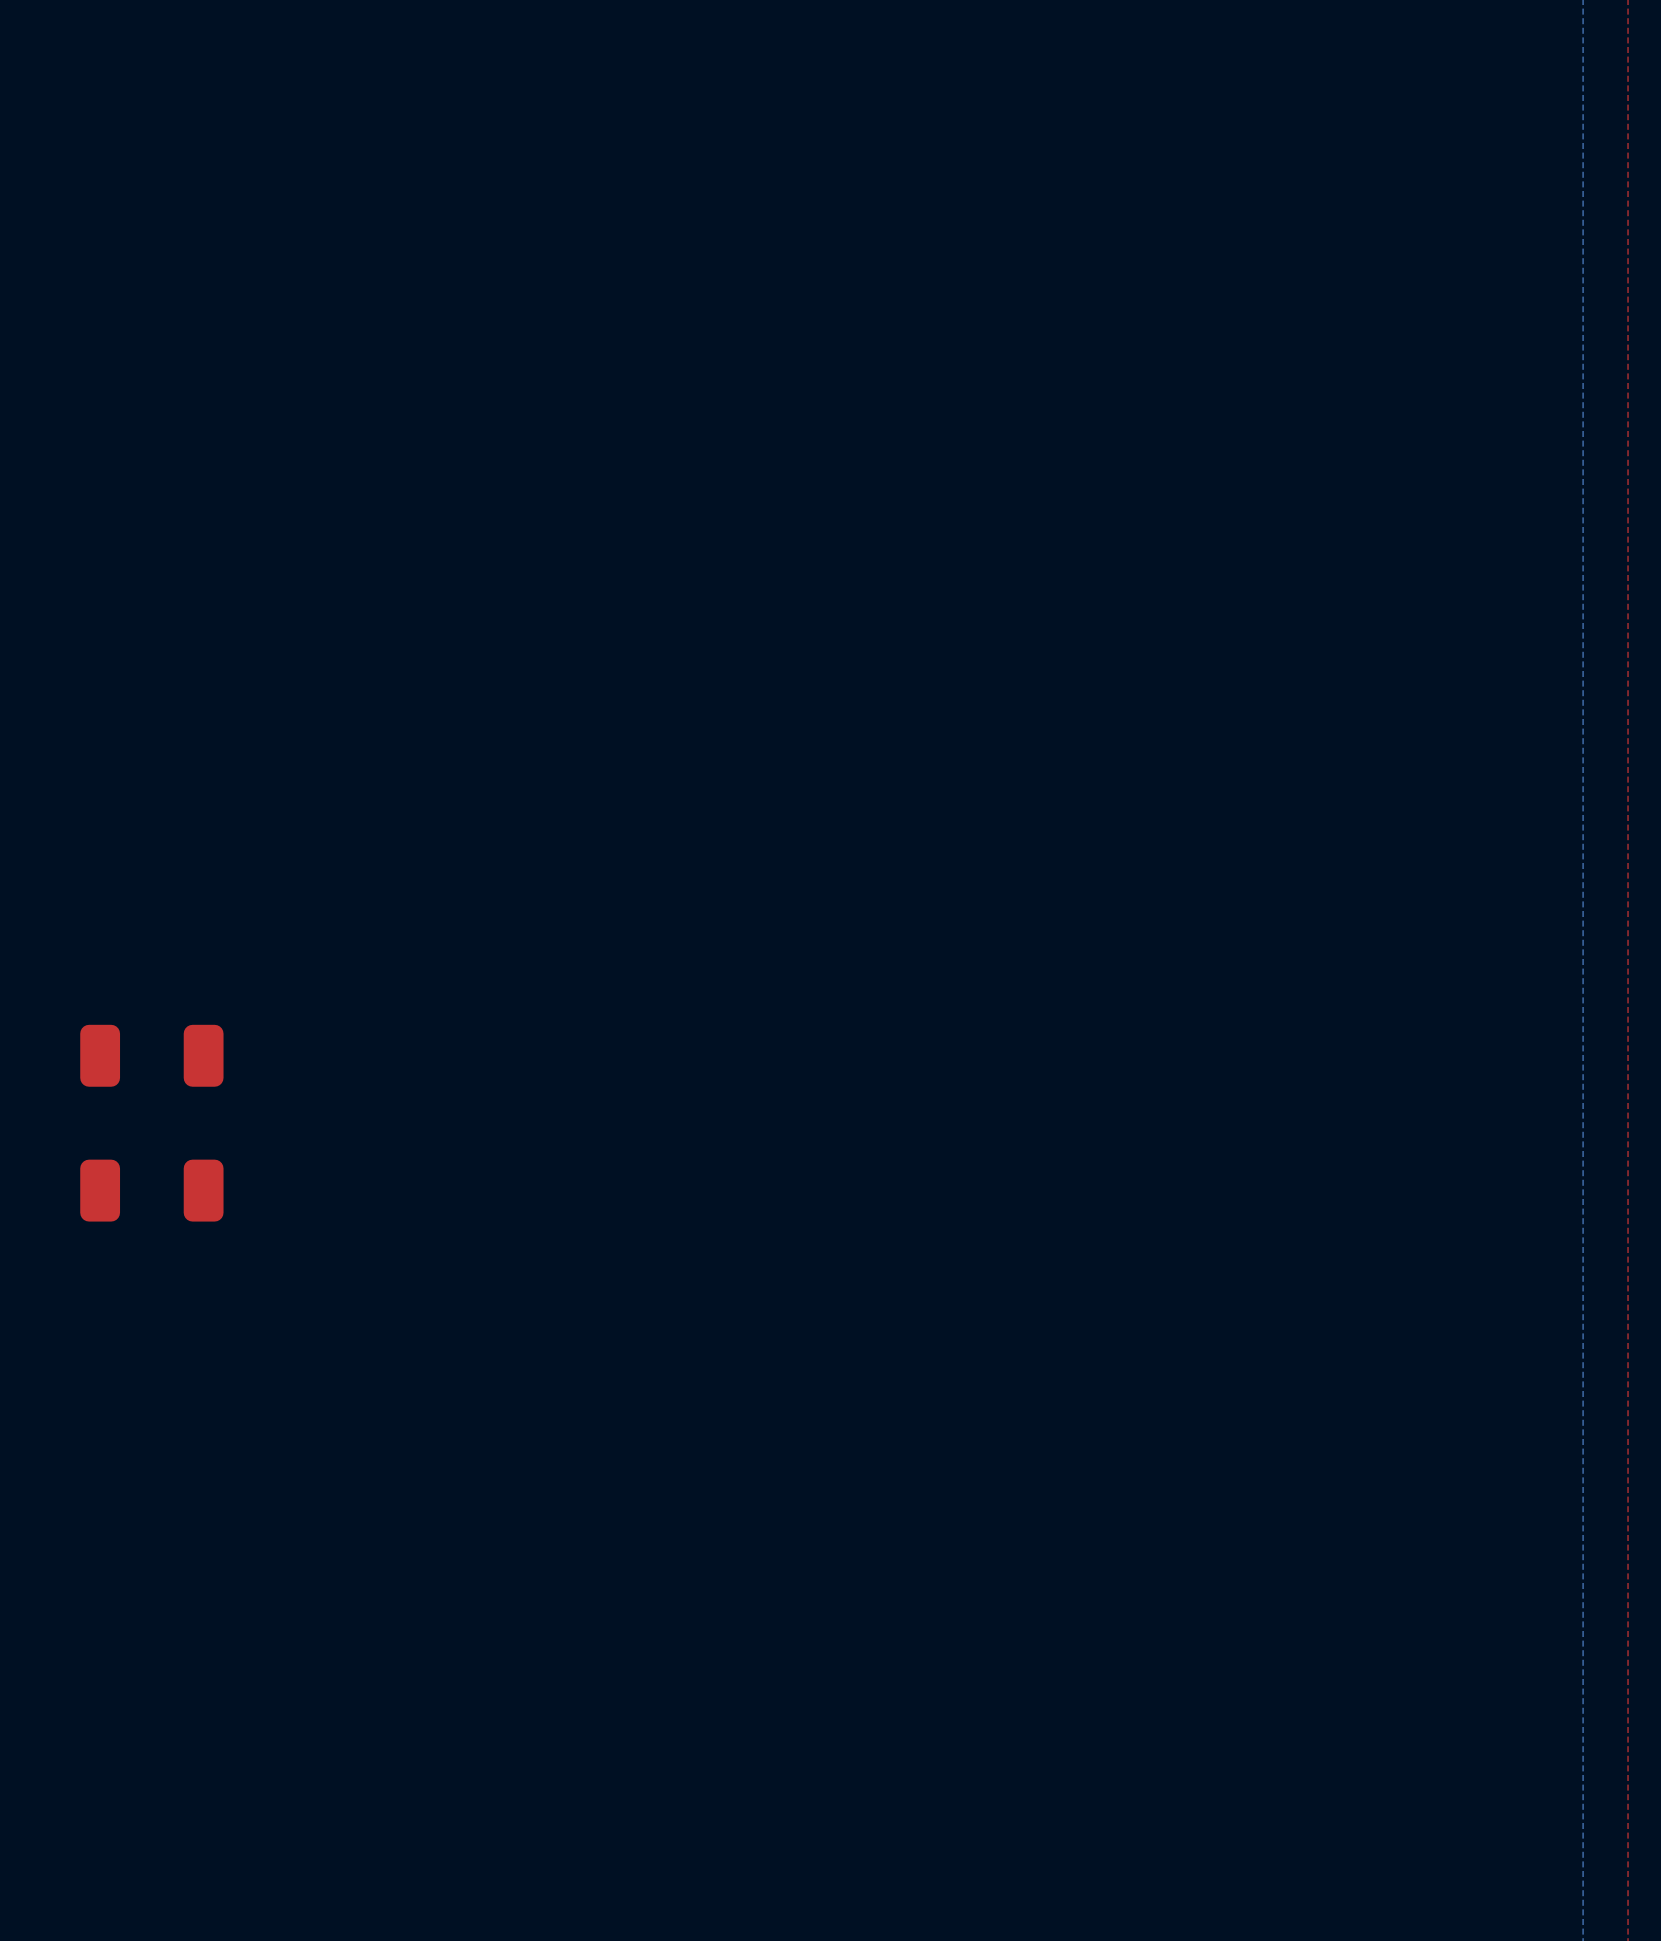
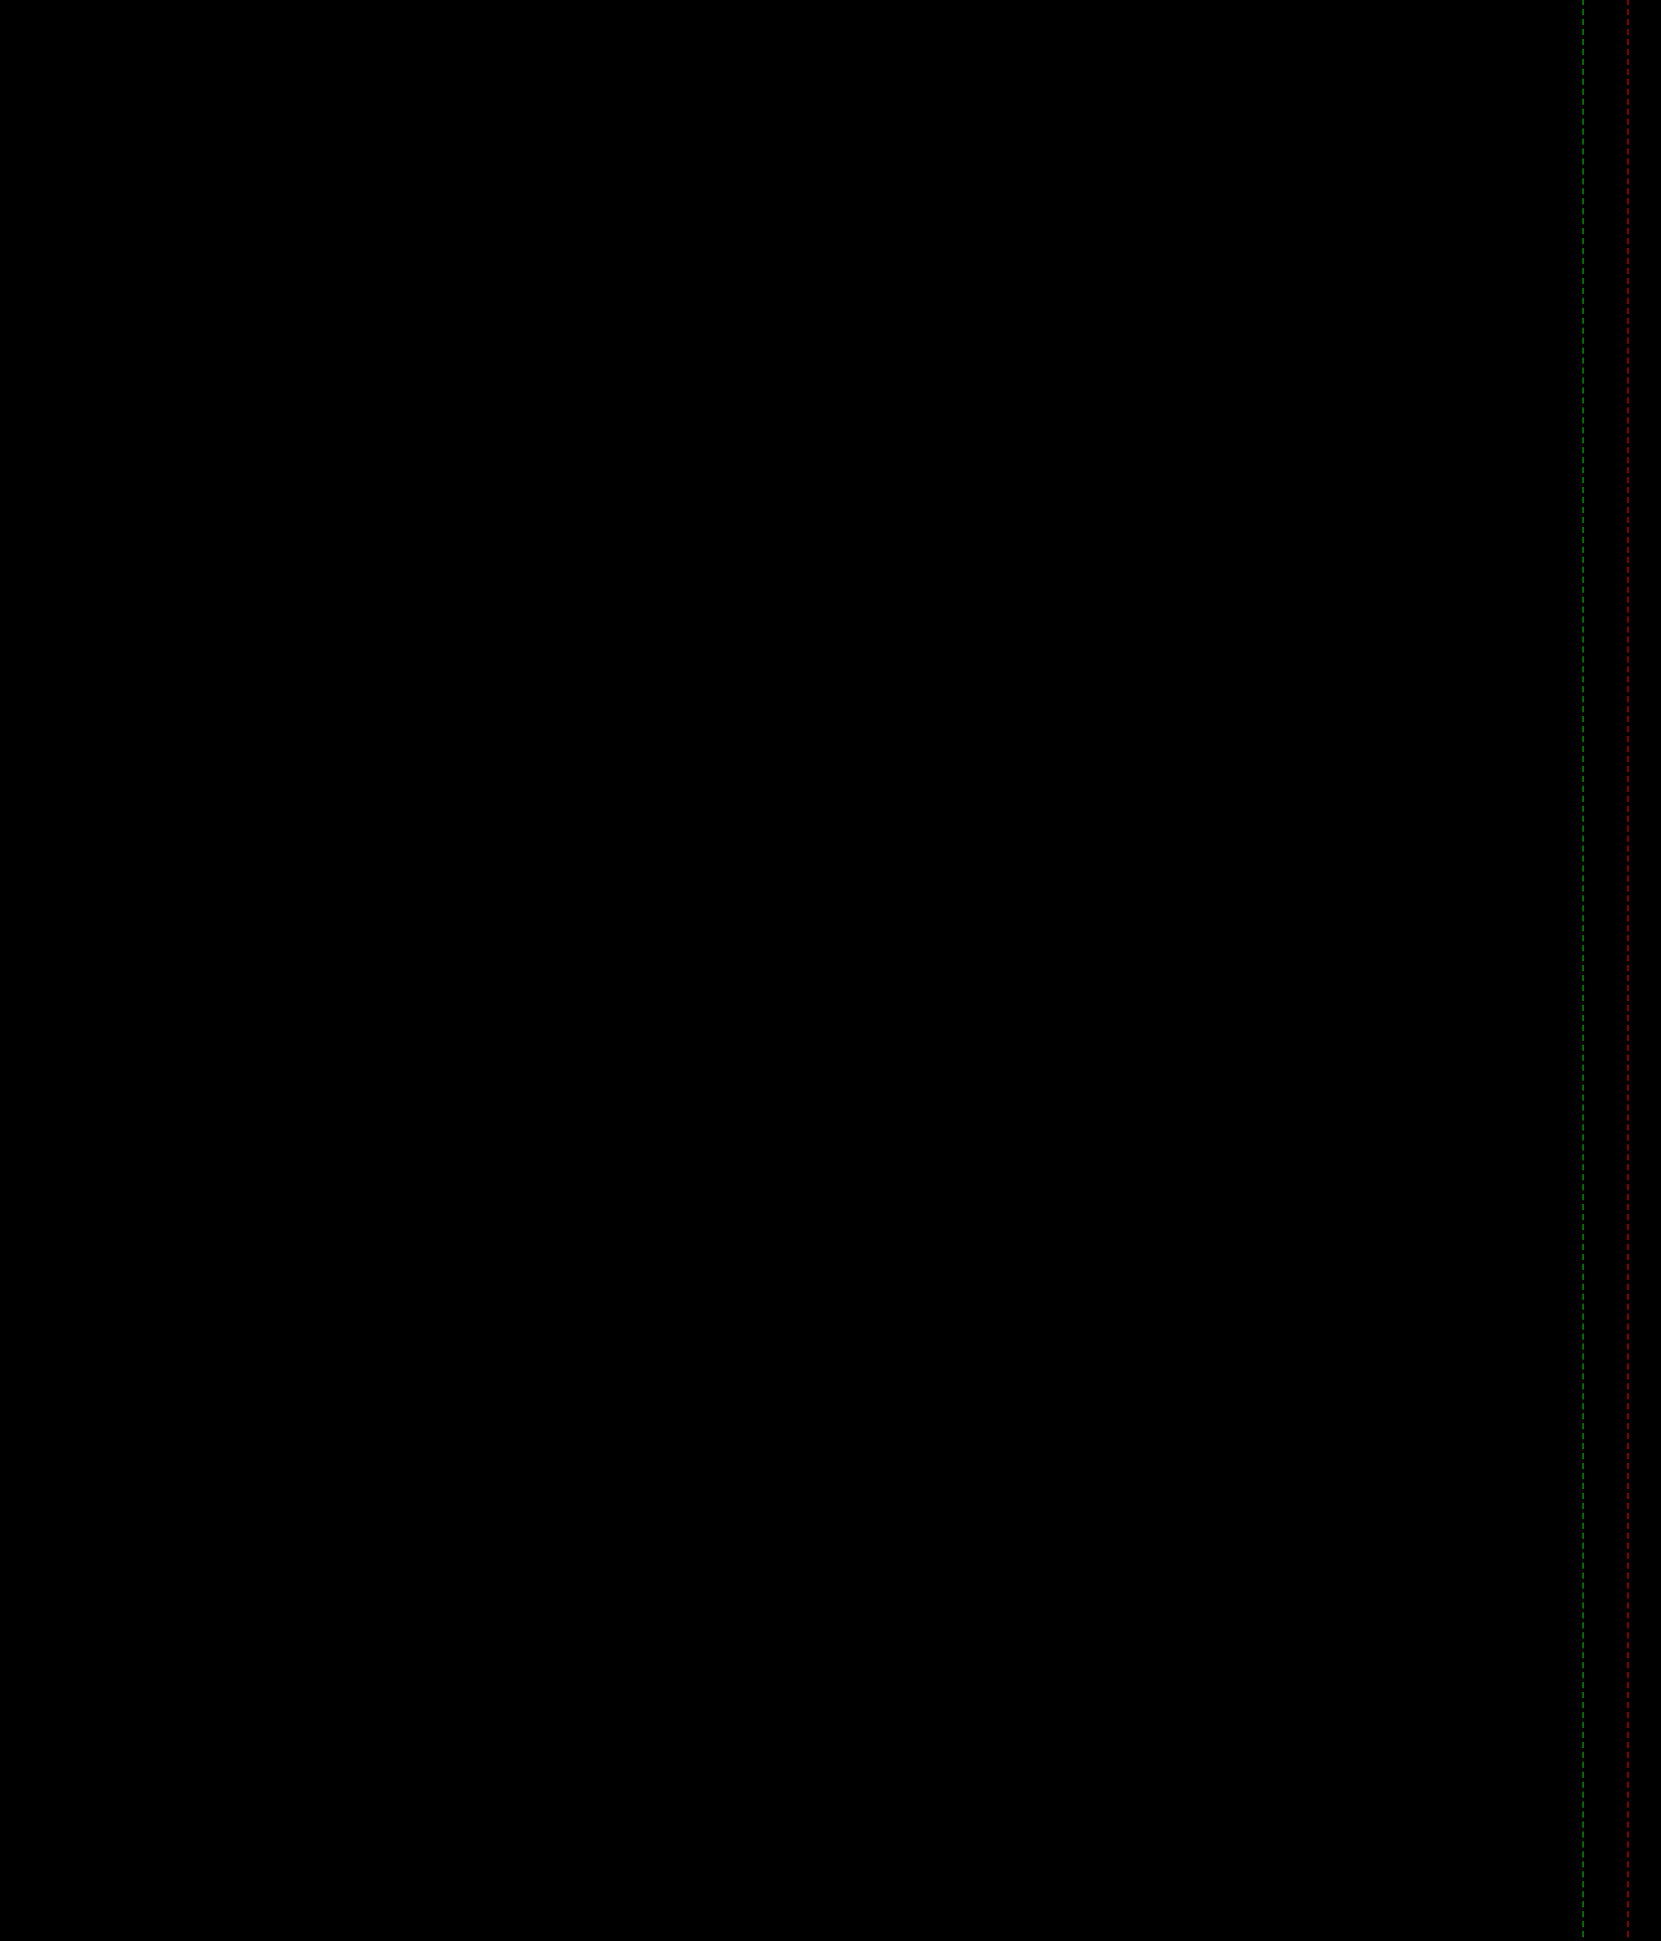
part: (151, 1055) -> none
part: (151, 1190) -> none

